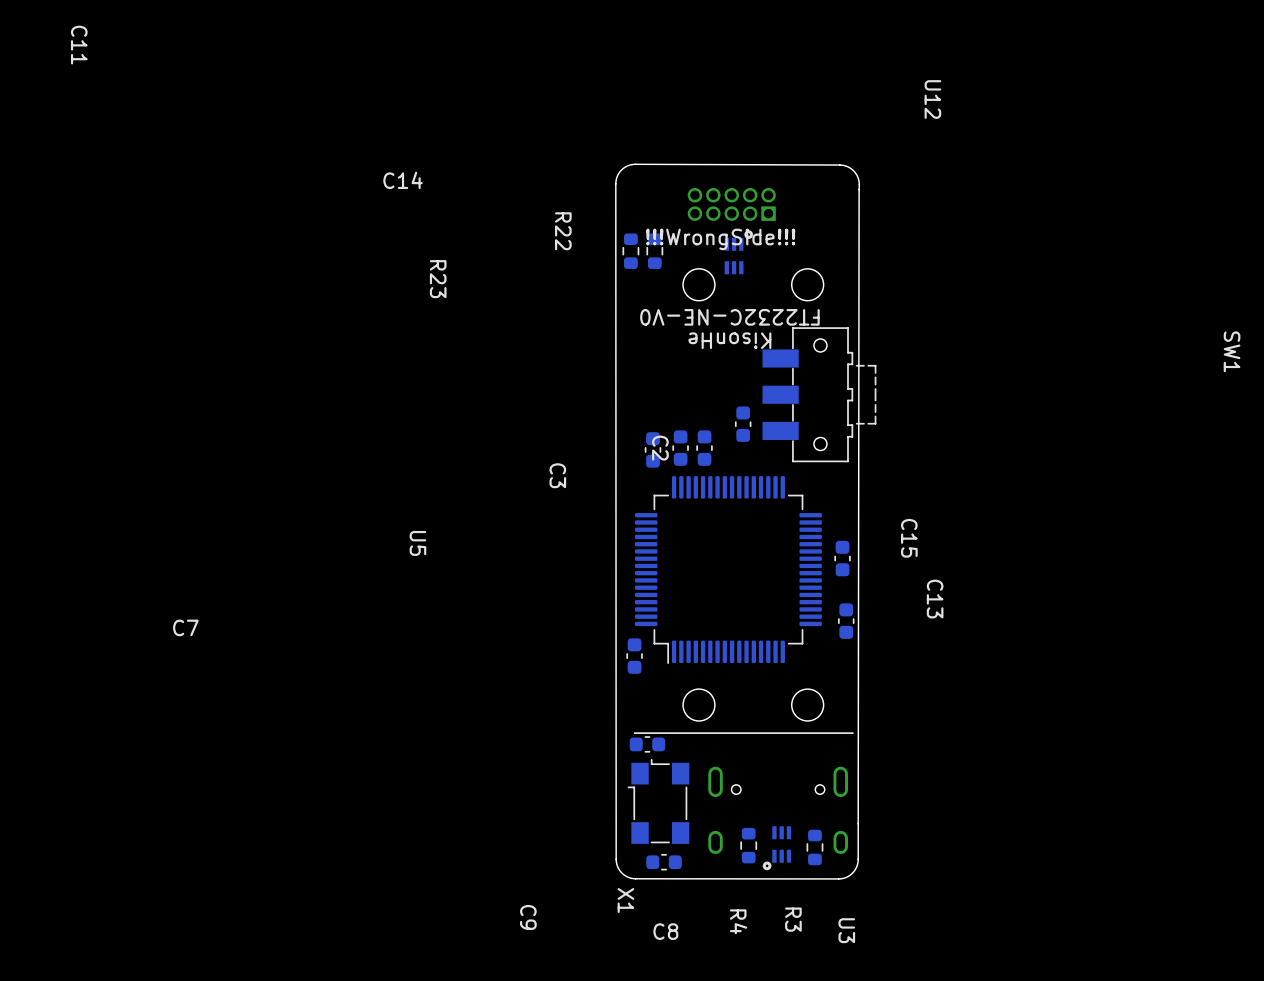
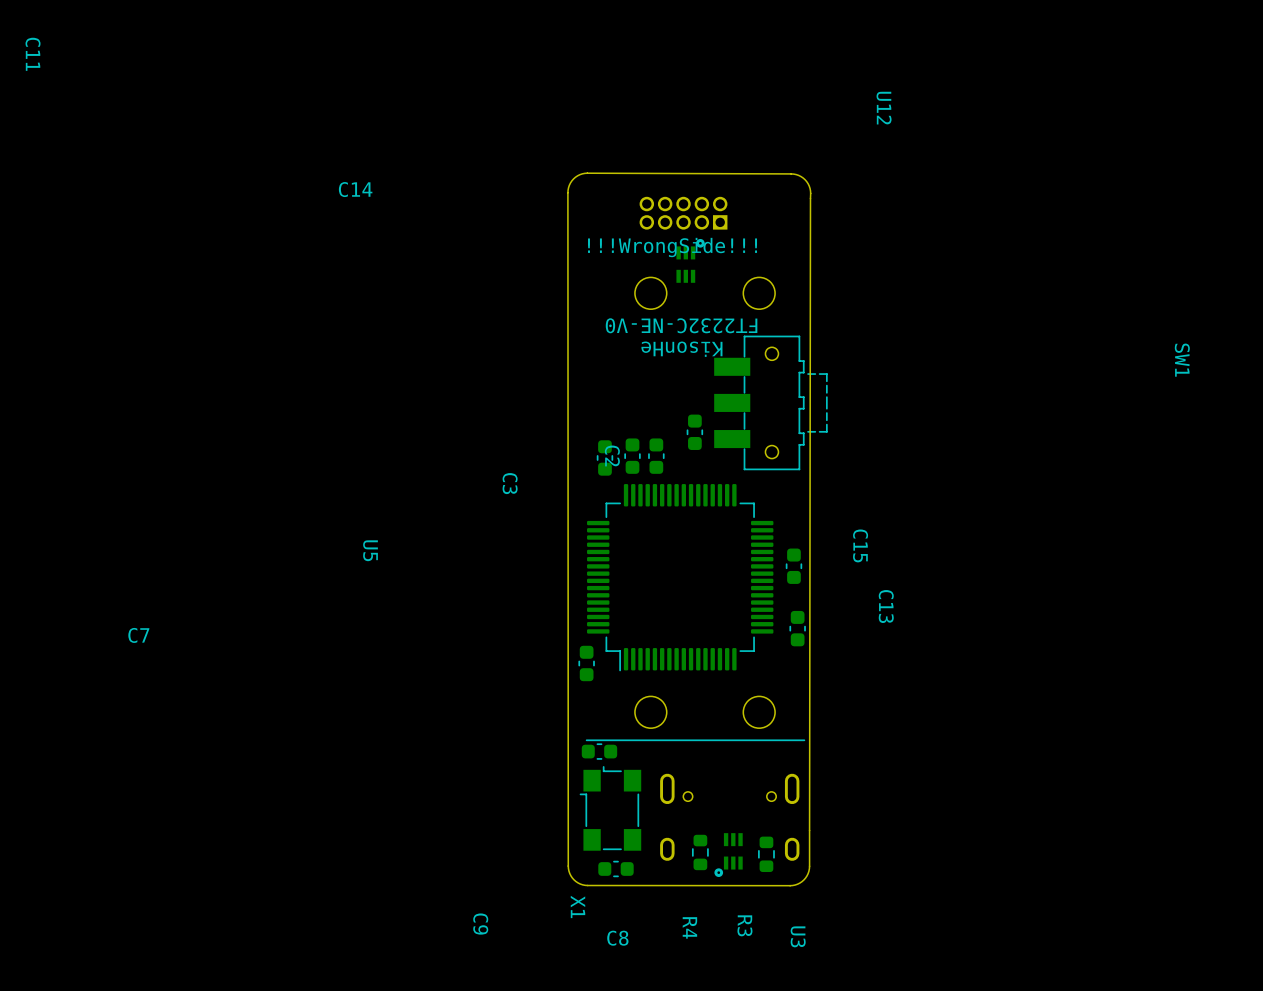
R23: (630, 251) -> none
R22: (654, 251) -> none

